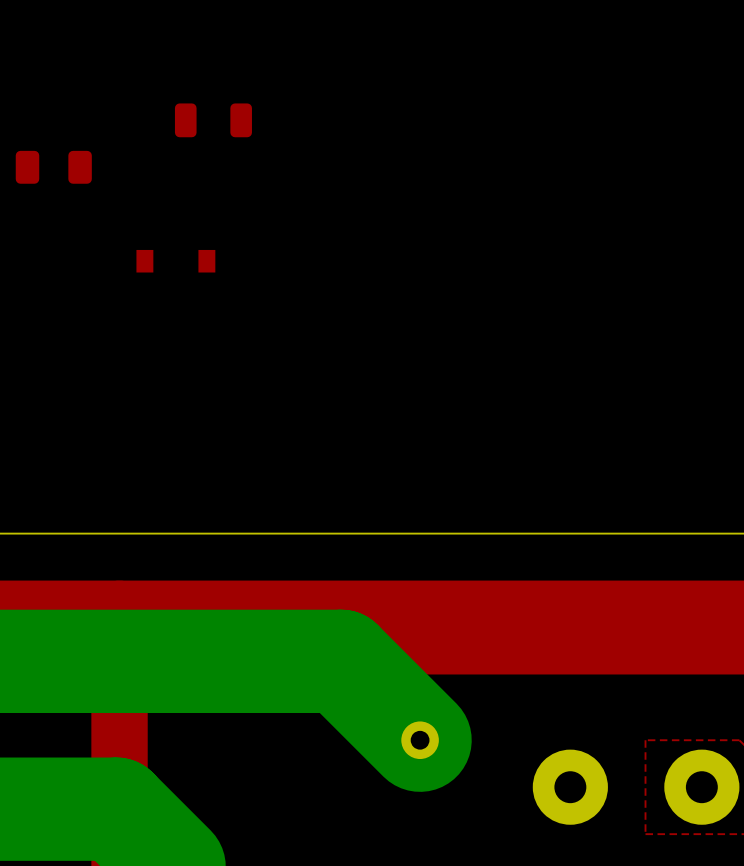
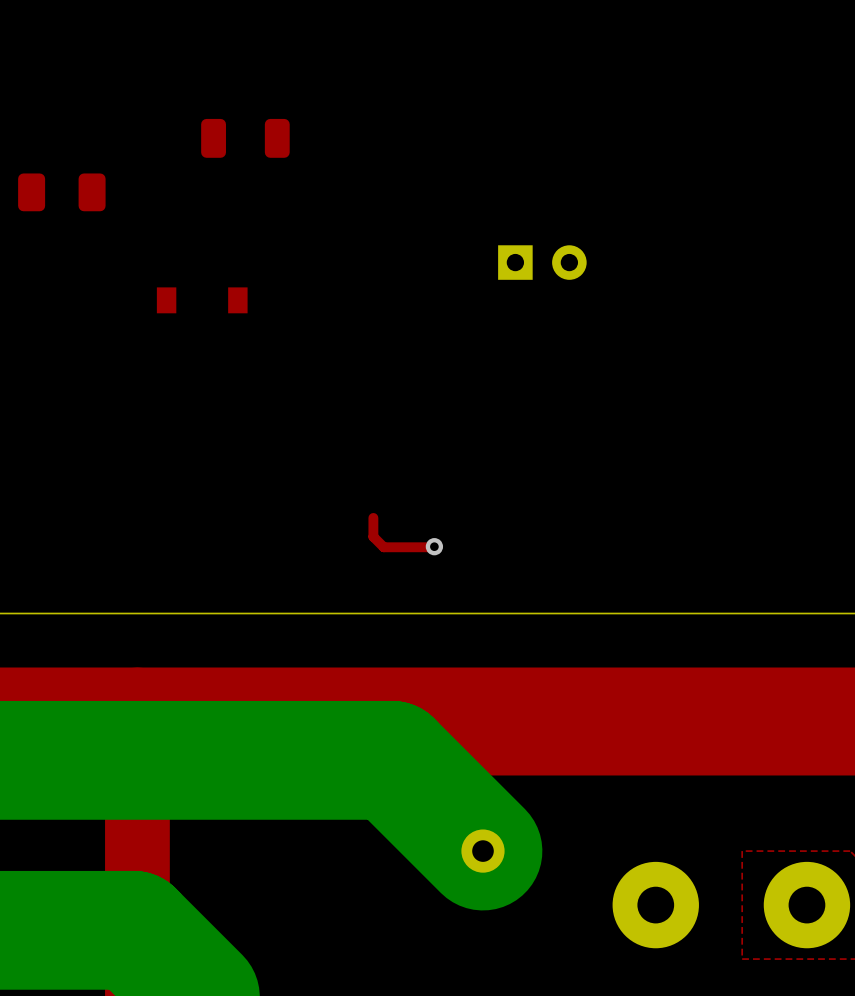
part: none -> (542, 262)
top track: none -> (373, 517) (373, 536) (383, 547) (434, 546)
via: none -> (434, 546)

